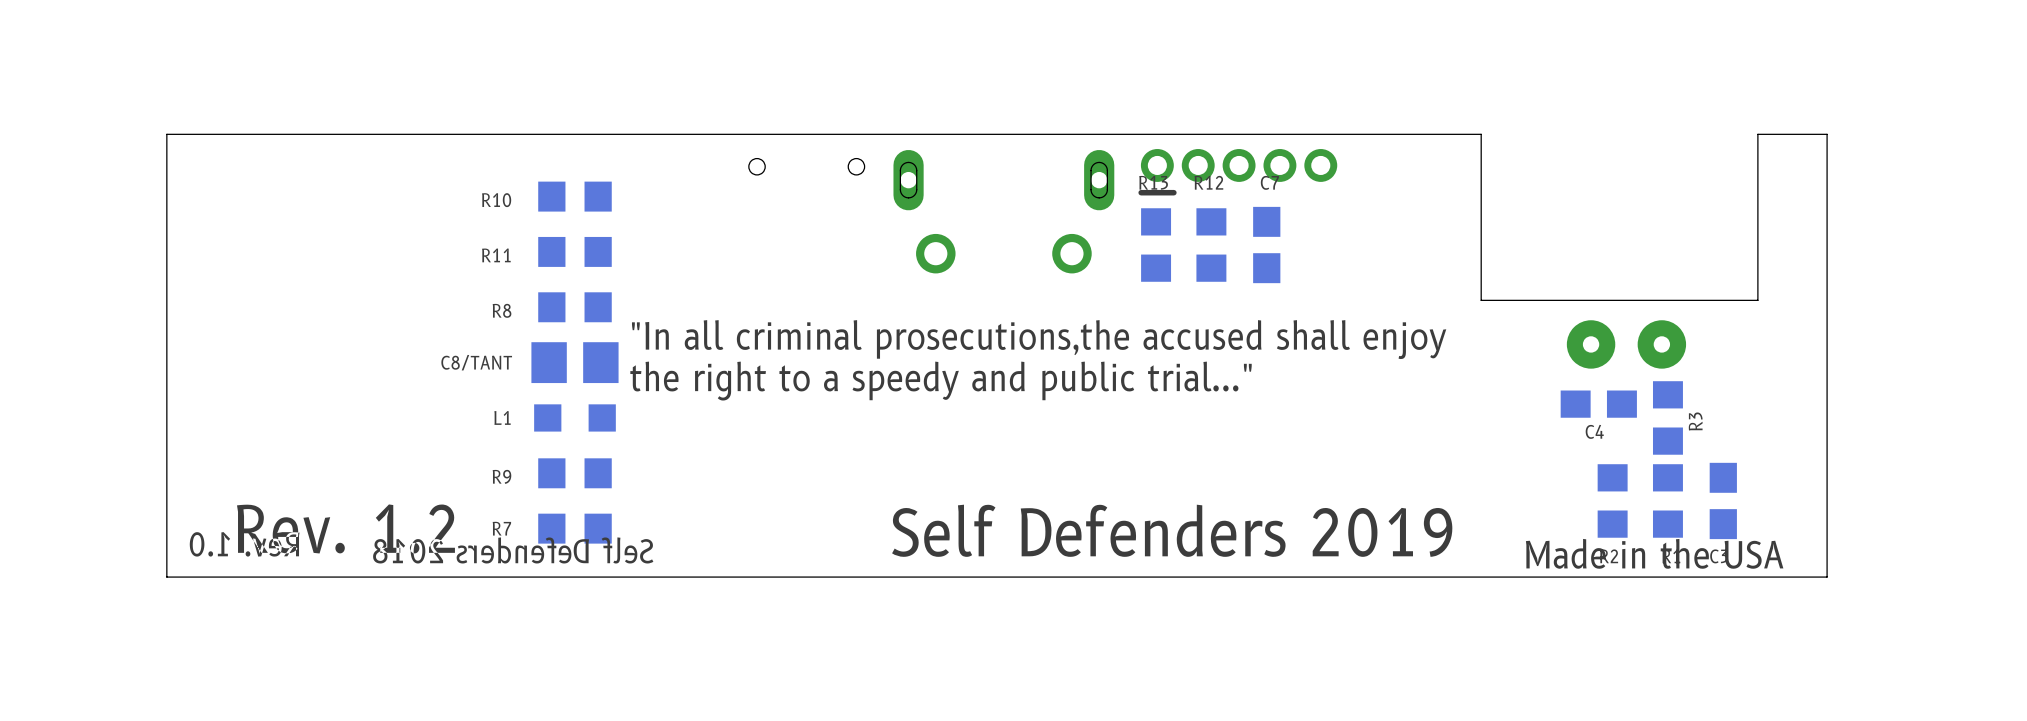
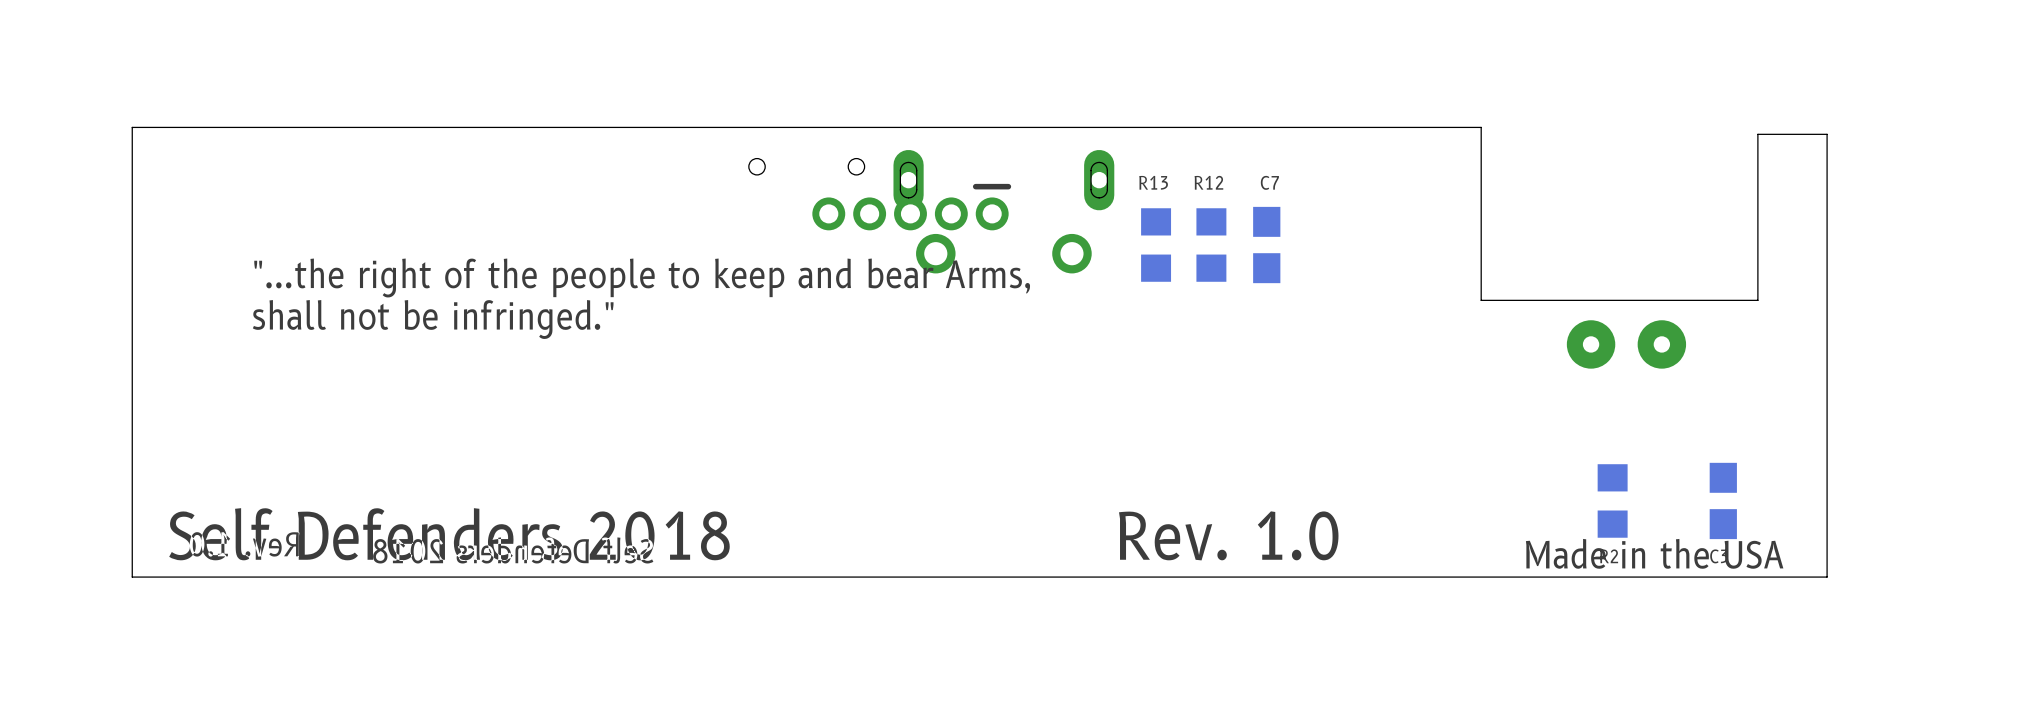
board edge: (1481, 134) (166, 134) (166, 577) -> (1481, 134) (1481, 127) (132, 127) (132, 577) (166, 577)
part rotation: 0° (1237, 172) -> 180° (911, 207)
part position: (1237, 172) -> (911, 207)
R10: (574, 196) -> none
R11: (574, 251) -> none
text: none -> "...the right of the people to keep and bear Arms, (642, 278)
R8: (574, 307) -> none
text: none -> shall not be infringed." (433, 319)
text: "In all criminal prosecutions,the accused shall enjoy (1039, 339) -> none
C8/TANT: (574, 362) -> none
text: the right to a speedy and public trial..." (941, 381) -> none
C4: (1598, 404) -> none
L1: (574, 417) -> none
R3: (1667, 417) -> none
R9: (574, 473) -> none
part: (1667, 500) -> none
text: Rev. 1.2 (345, 528) -> none
R7: (574, 528) -> none
text: Self Defenders 2019 (1172, 530) -> none
text: none -> Self Defenders 2018 (449, 534)
text: none -> Rev. 1.0 (1228, 535)

